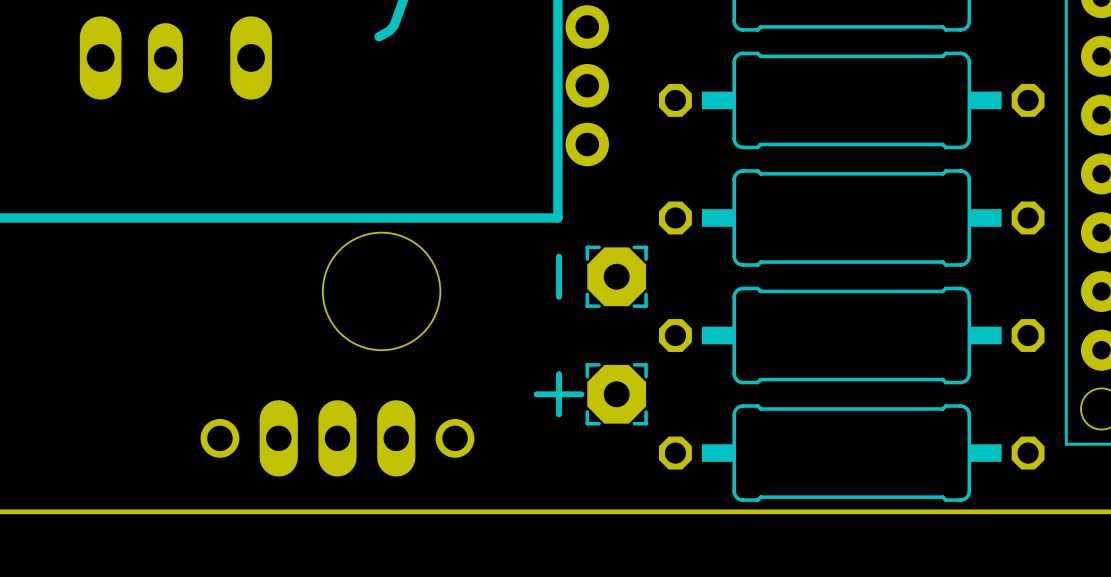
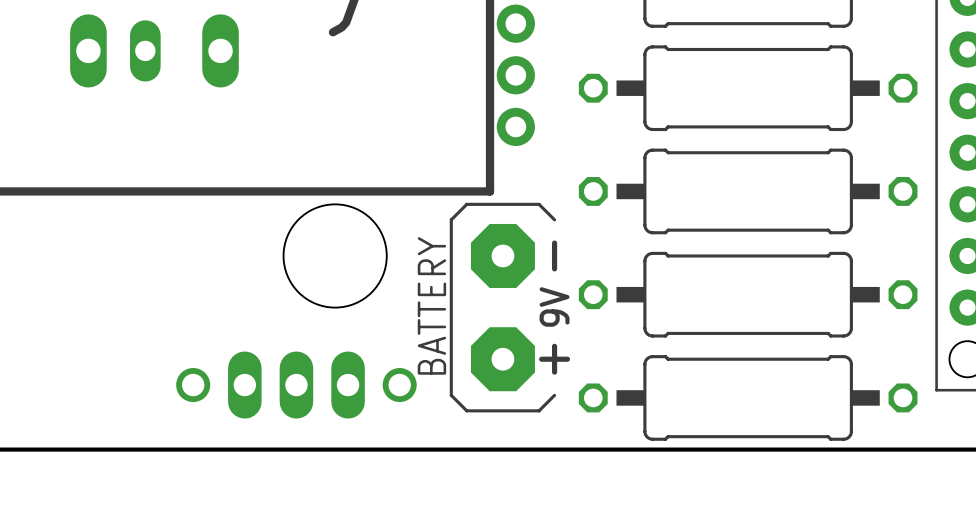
part: (616, 276) -> none
BATTERY: none -> (509, 307)
part: (616, 394) -> none

